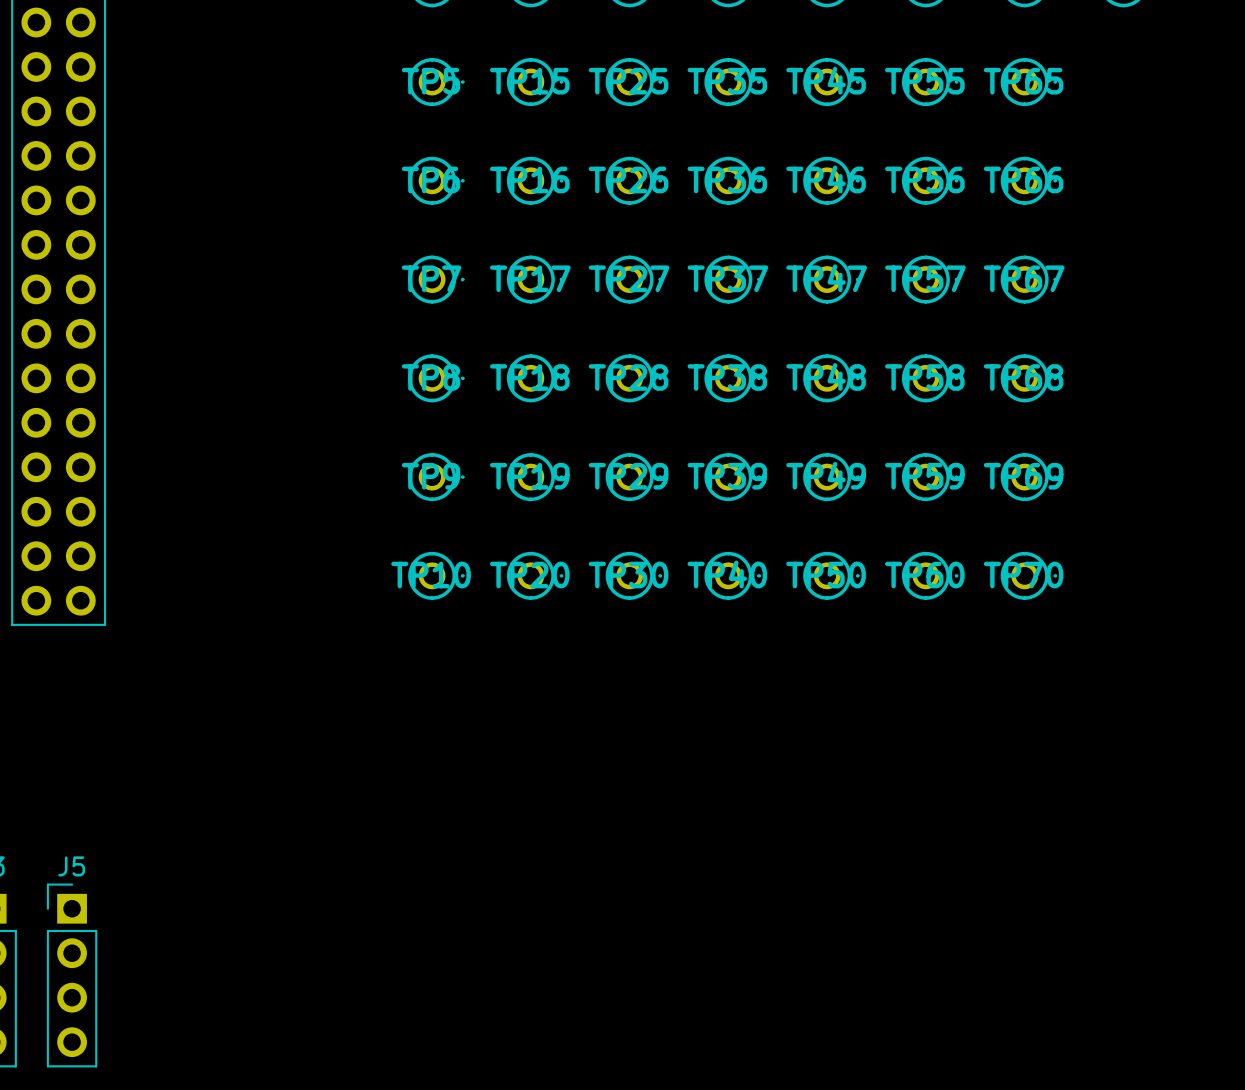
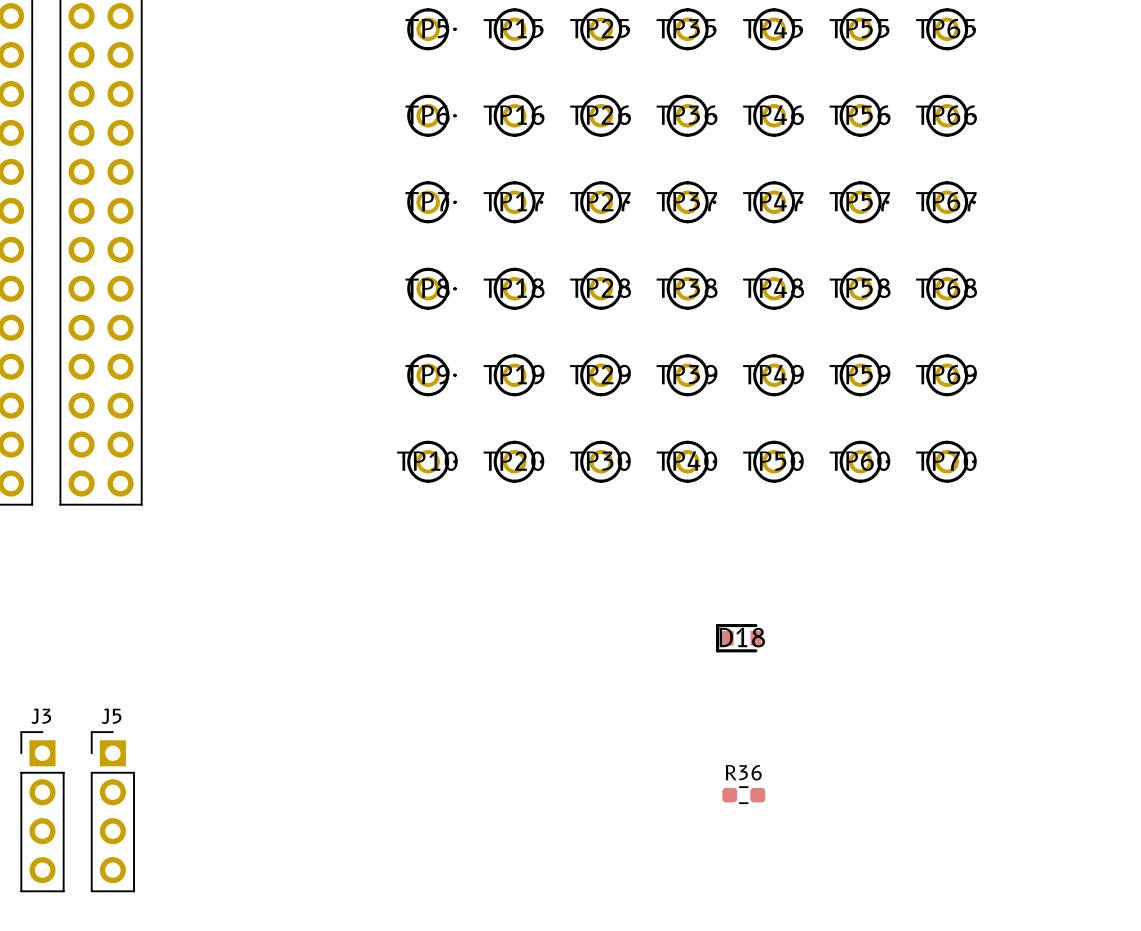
D18: none -> (738, 638)
R36: none -> (743, 795)

